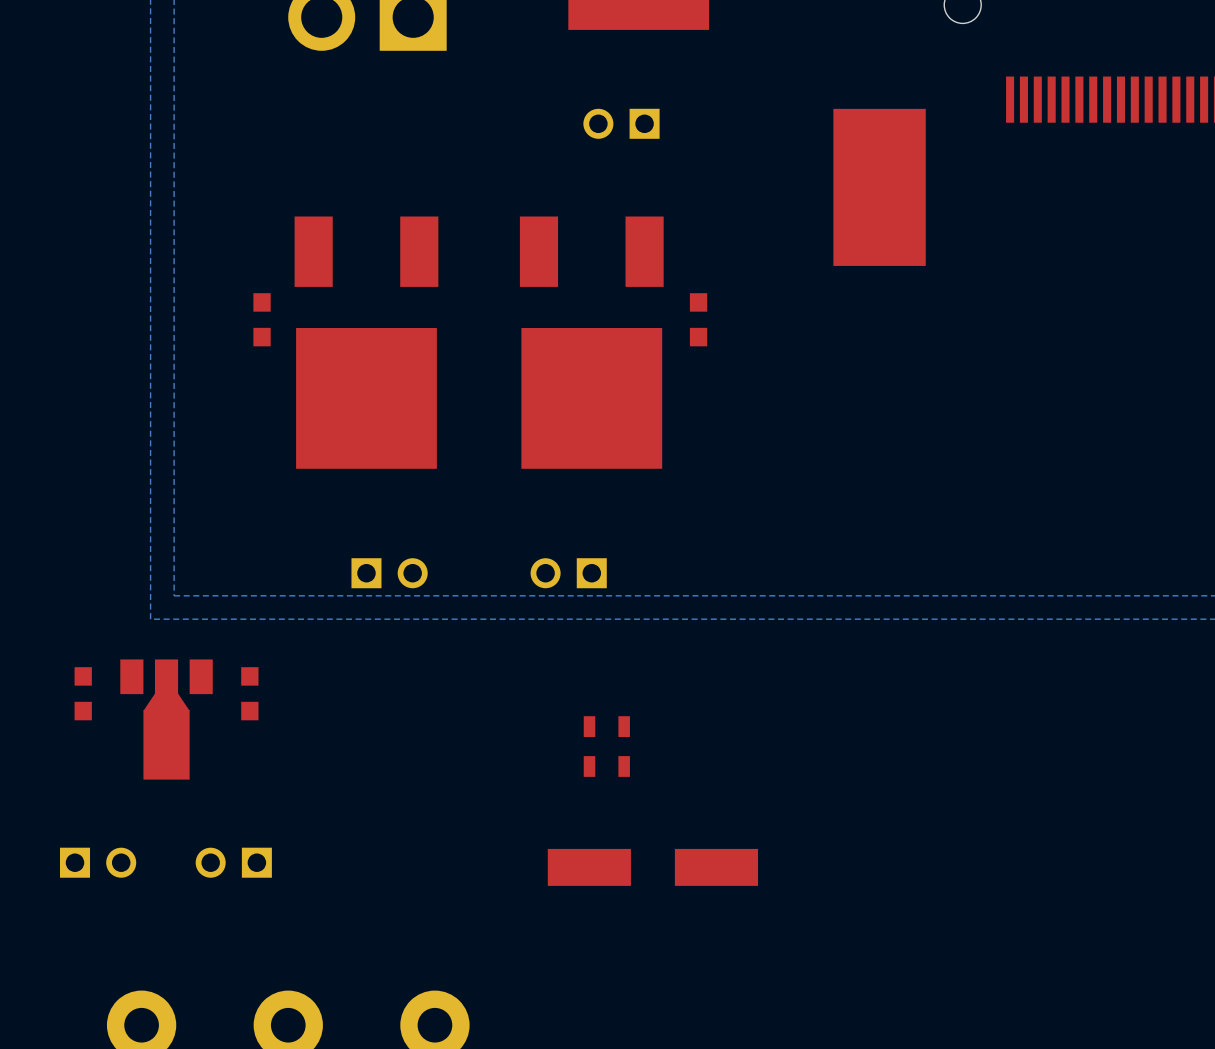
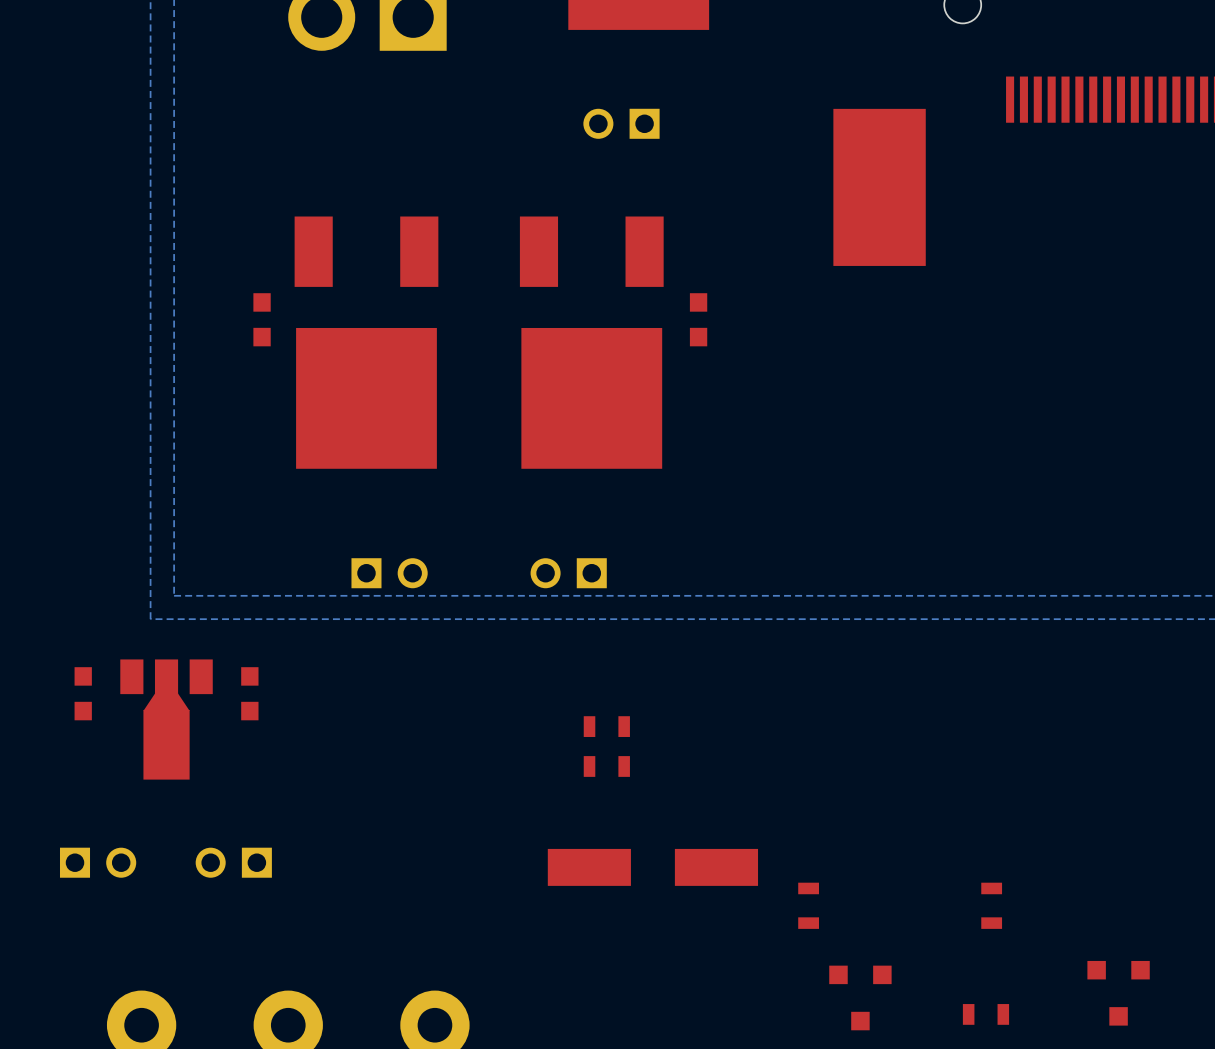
part: none -> (808, 905)
part: none -> (991, 905)
part: none -> (1118, 993)
part: none -> (860, 997)
part: none -> (985, 1014)

